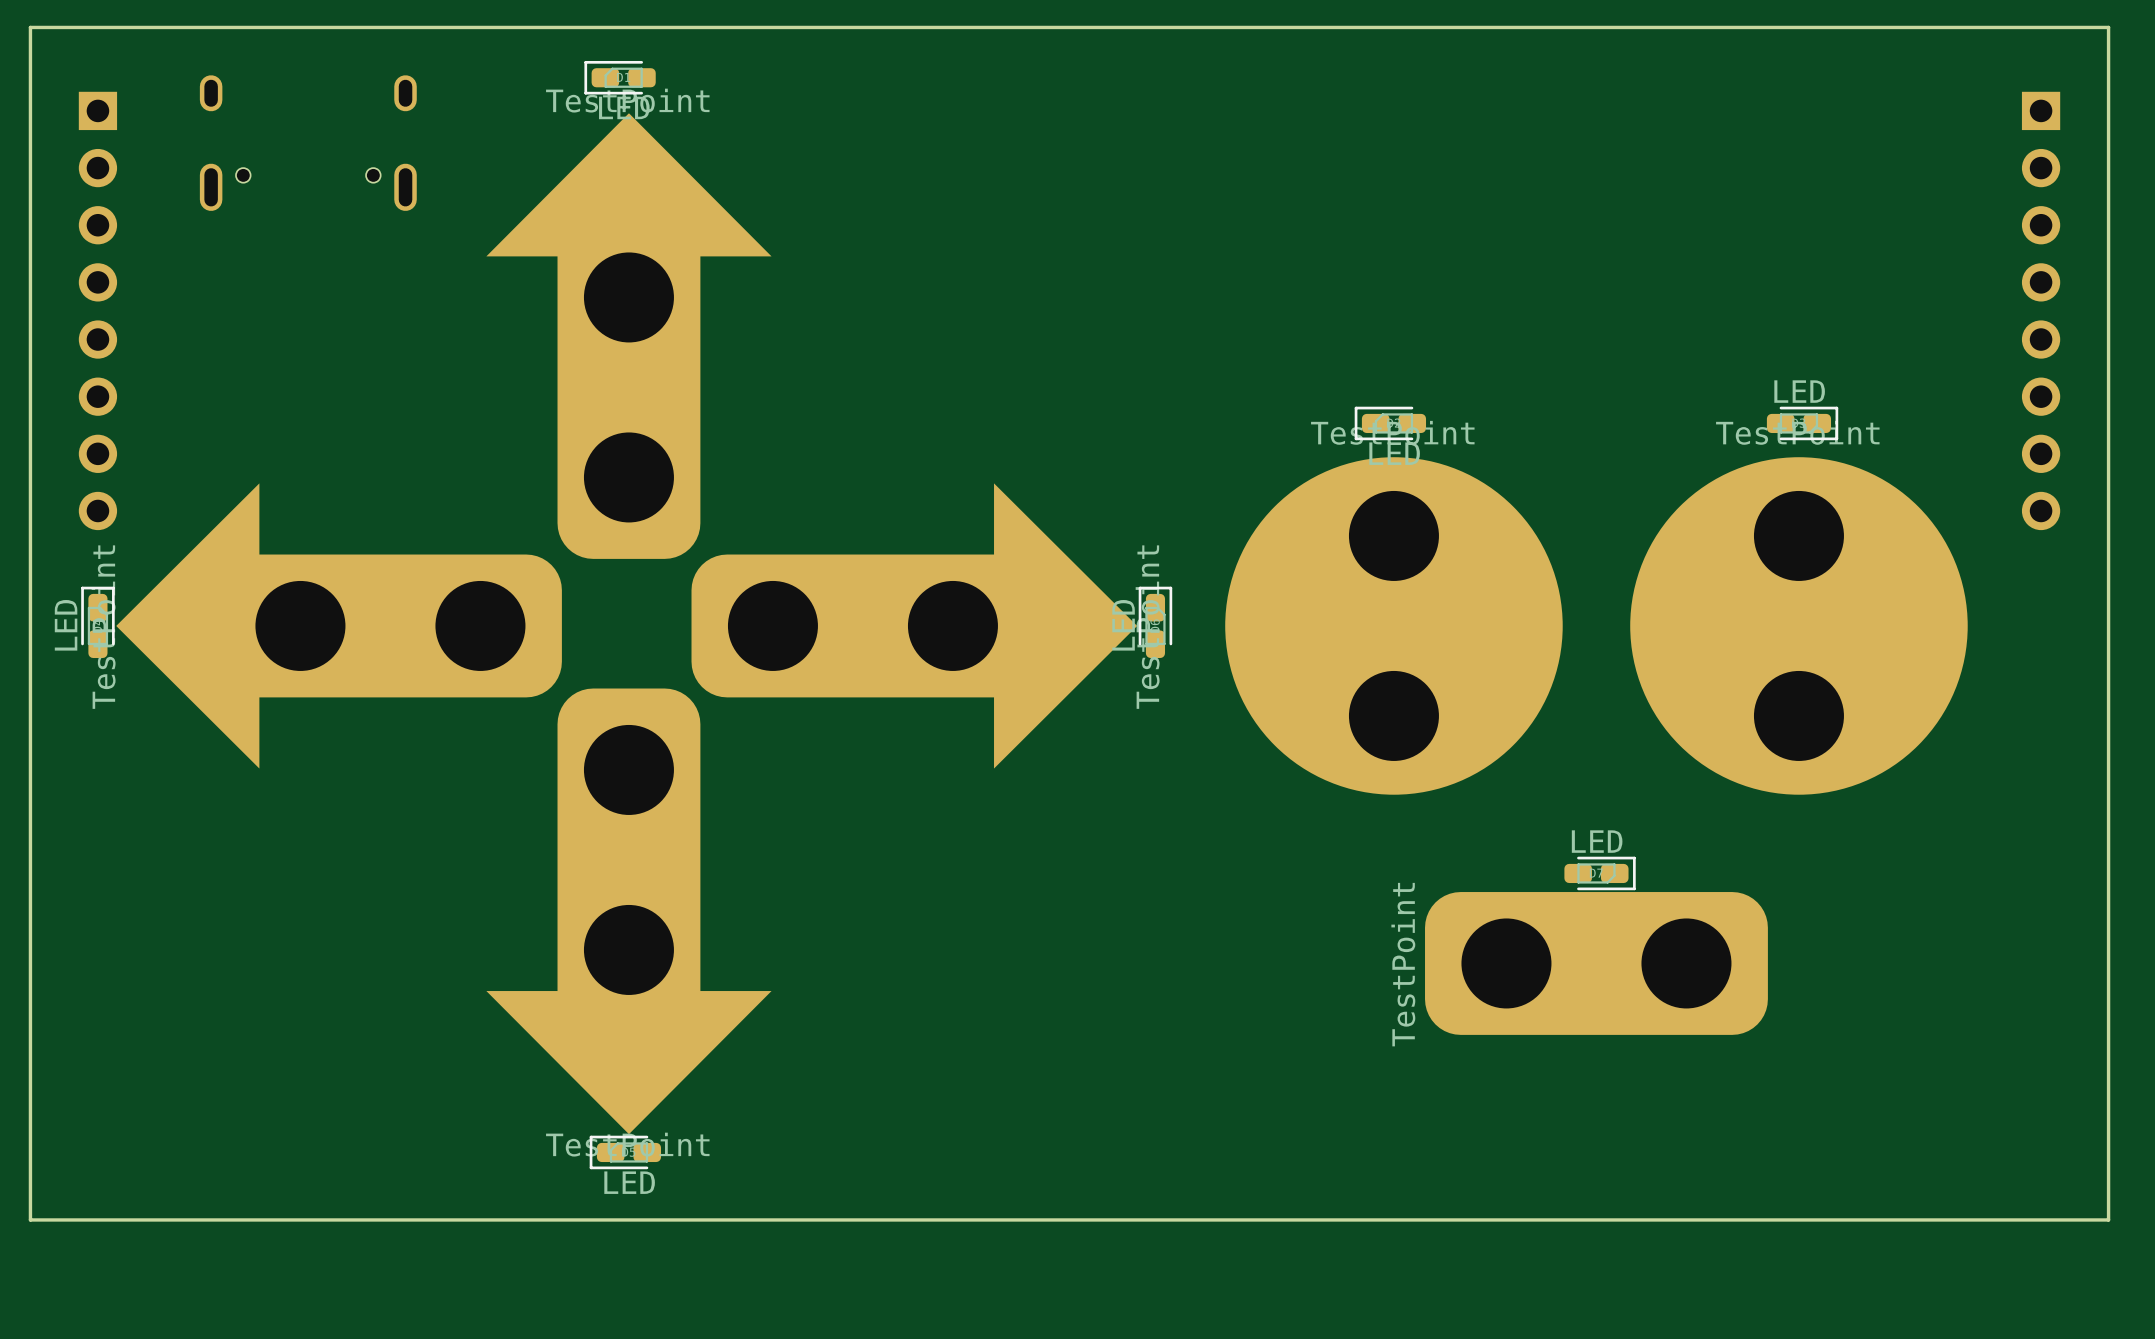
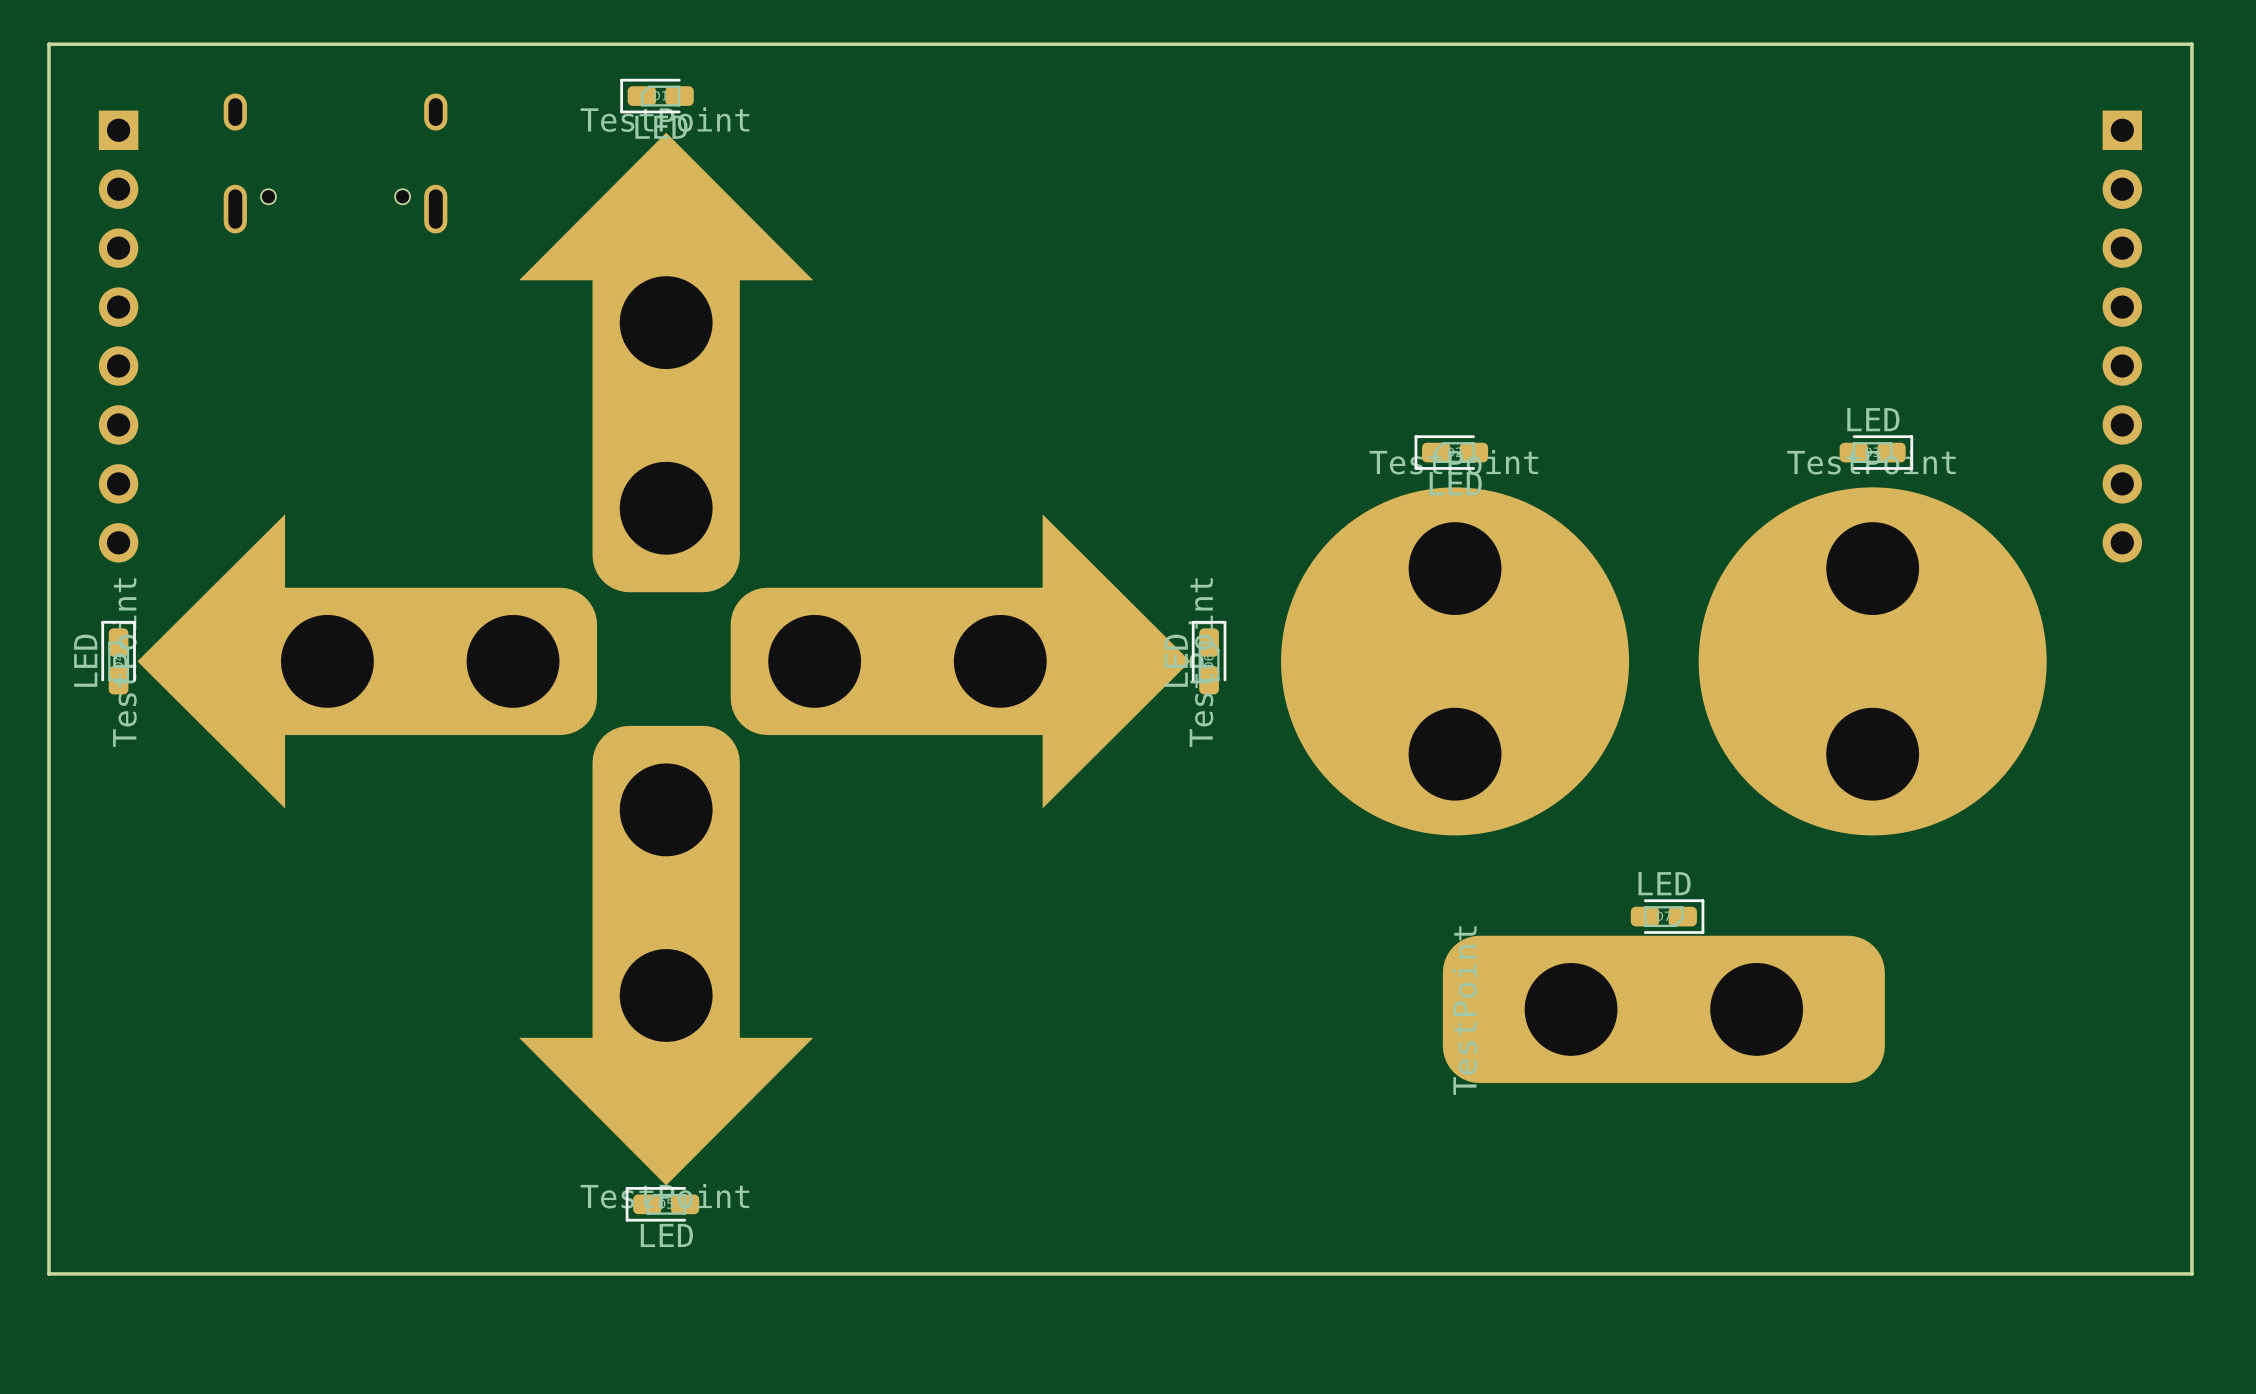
part footprint: [1425, 892, 1768, 1035] -> [1442, 935, 1885, 1084]

